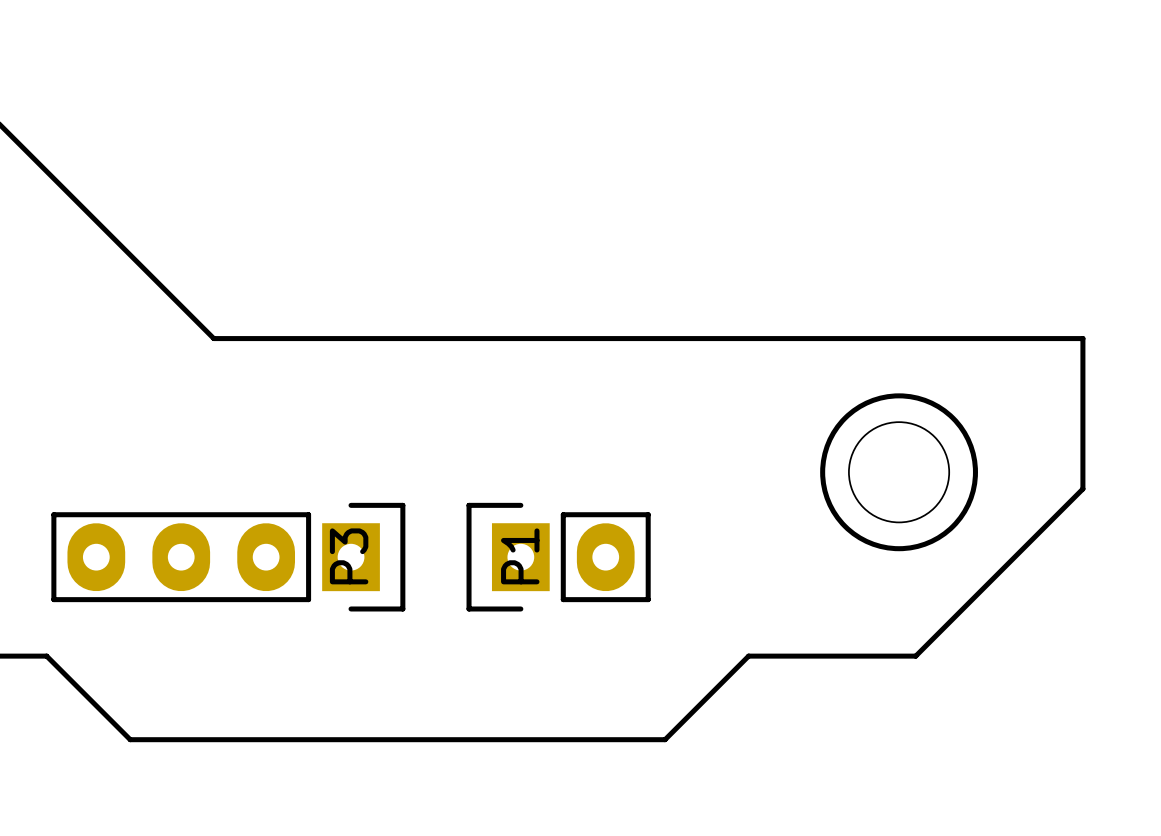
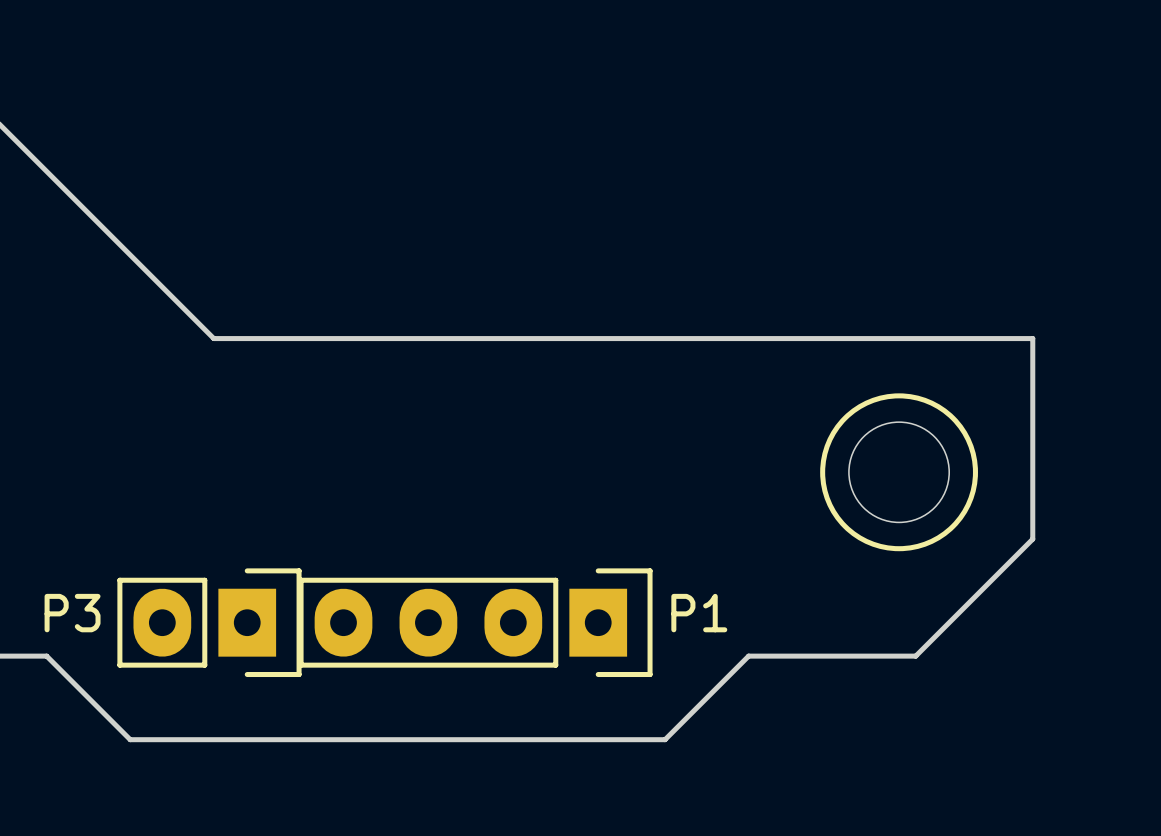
board edge: (1032, 338) (1082, 338) (1082, 488) (1032, 539) -> (1032, 338) (1032, 539)
P3 name position: P3 (349, 556) -> P3 (72, 613)
P1 name rotation: 0° (520, 556) -> 90° clockwise (699, 613)
P1 position: (228, 557) -> (475, 622)
P3 rotation: 0° (558, 557) -> 180° (209, 622)
P3 position: (558, 557) -> (209, 622)

